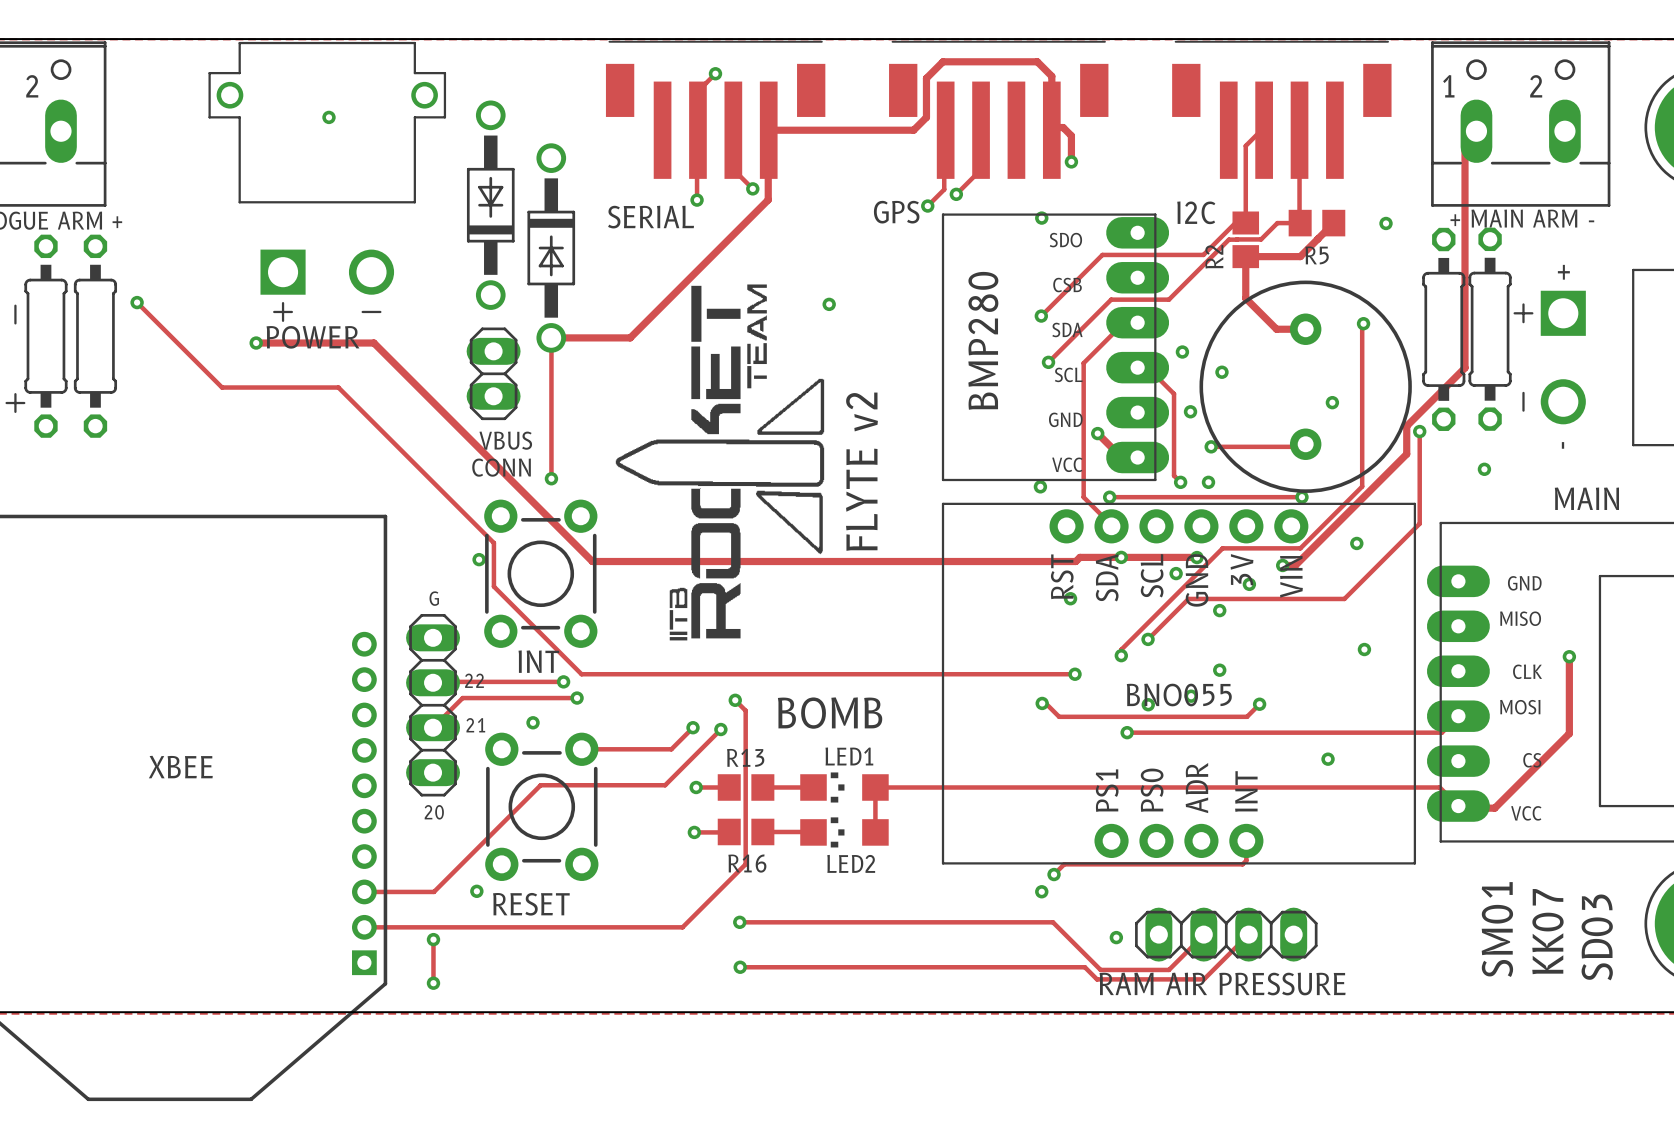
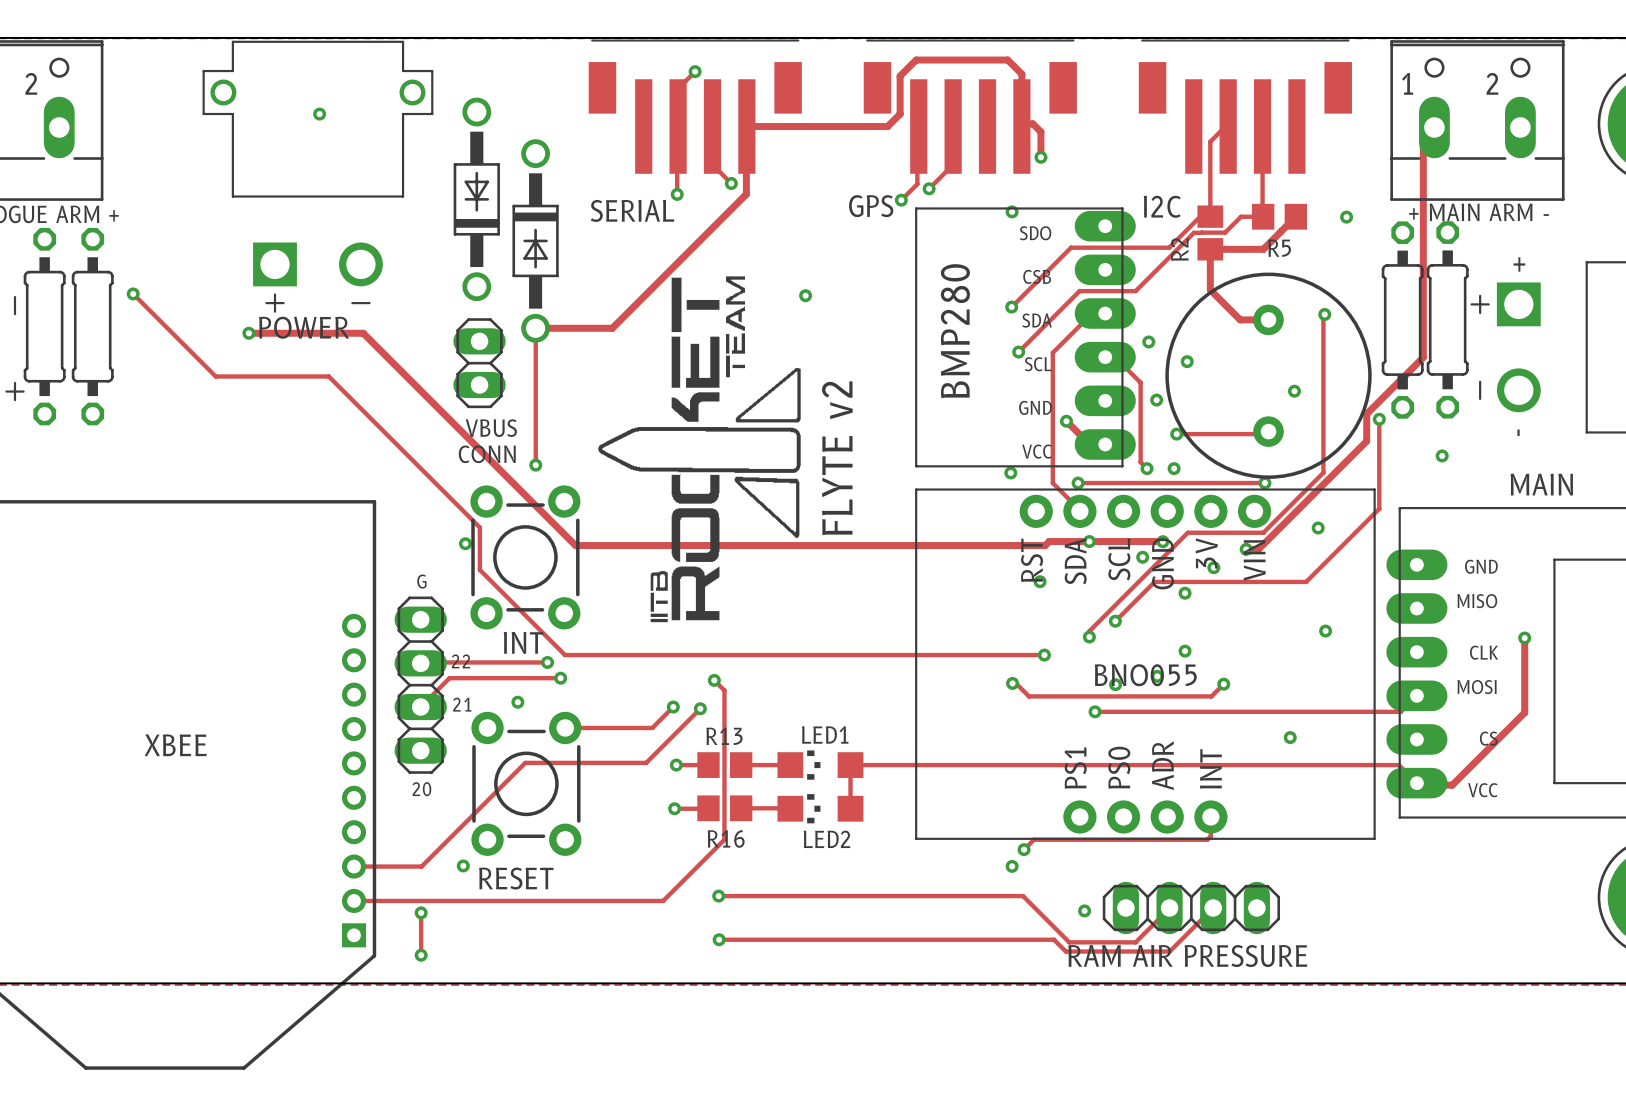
text: BOMB (830, 713) -> none
text: SM01 (1497, 929) -> none
text: KK07 (1547, 931) -> none
text: SD03 (1597, 937) -> none

